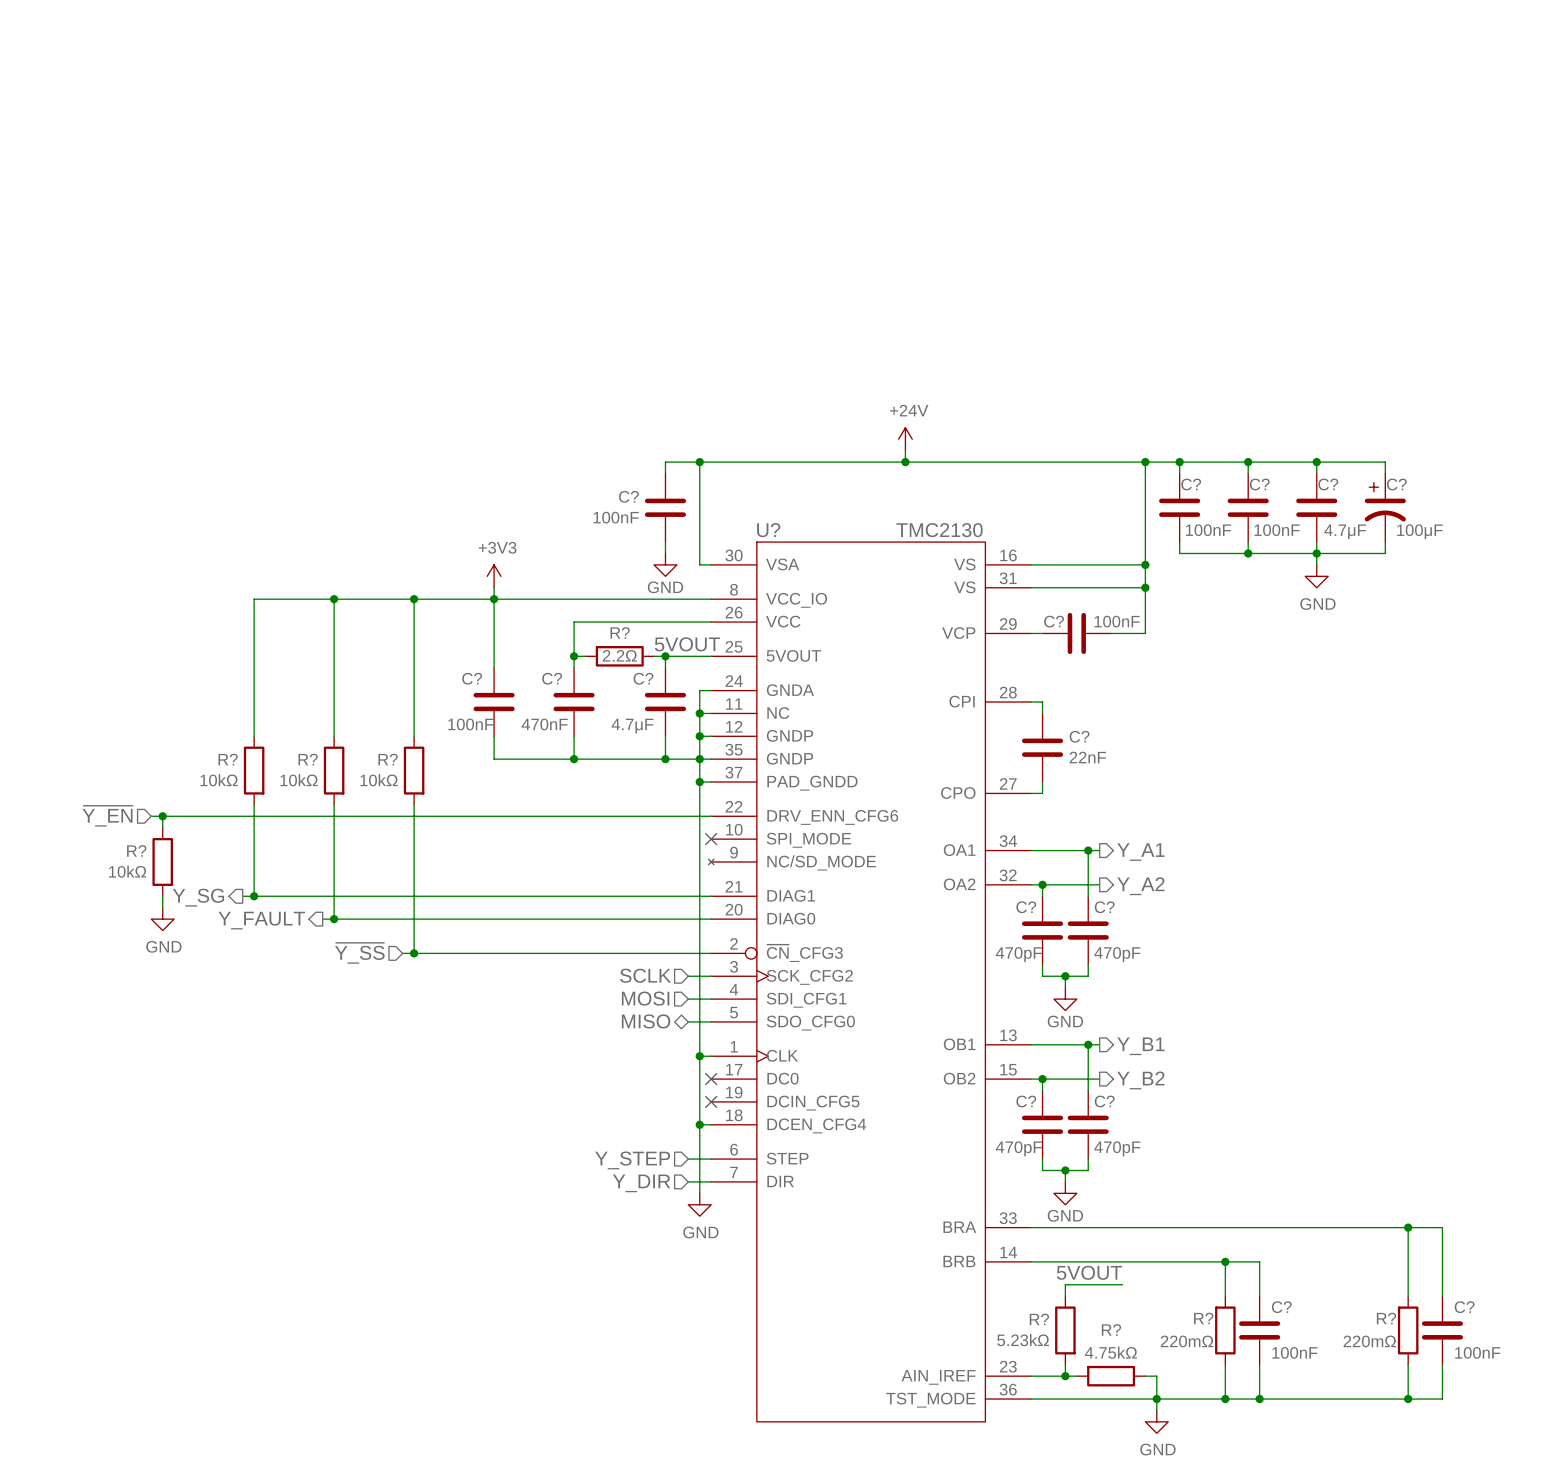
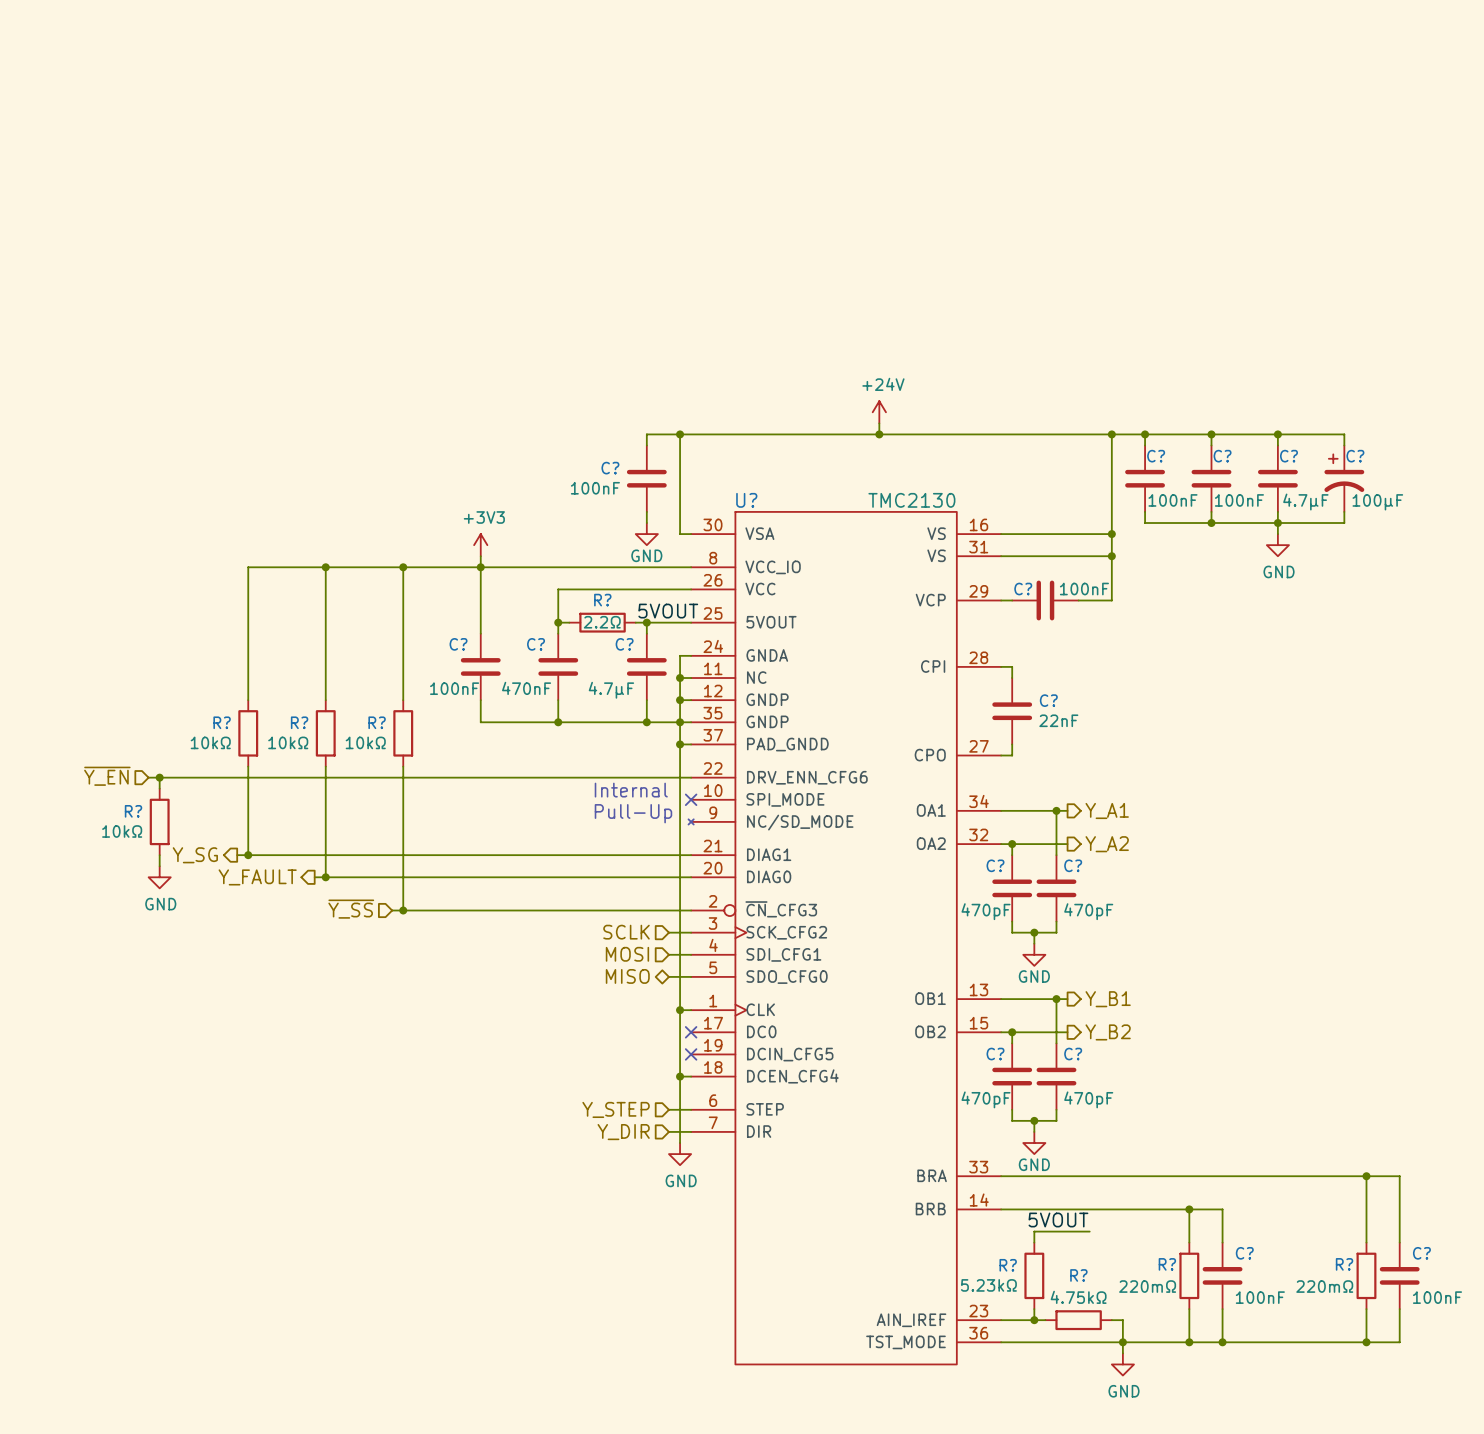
text: none -> Internal (631, 790)
text: none -> Pull-Up (633, 813)

